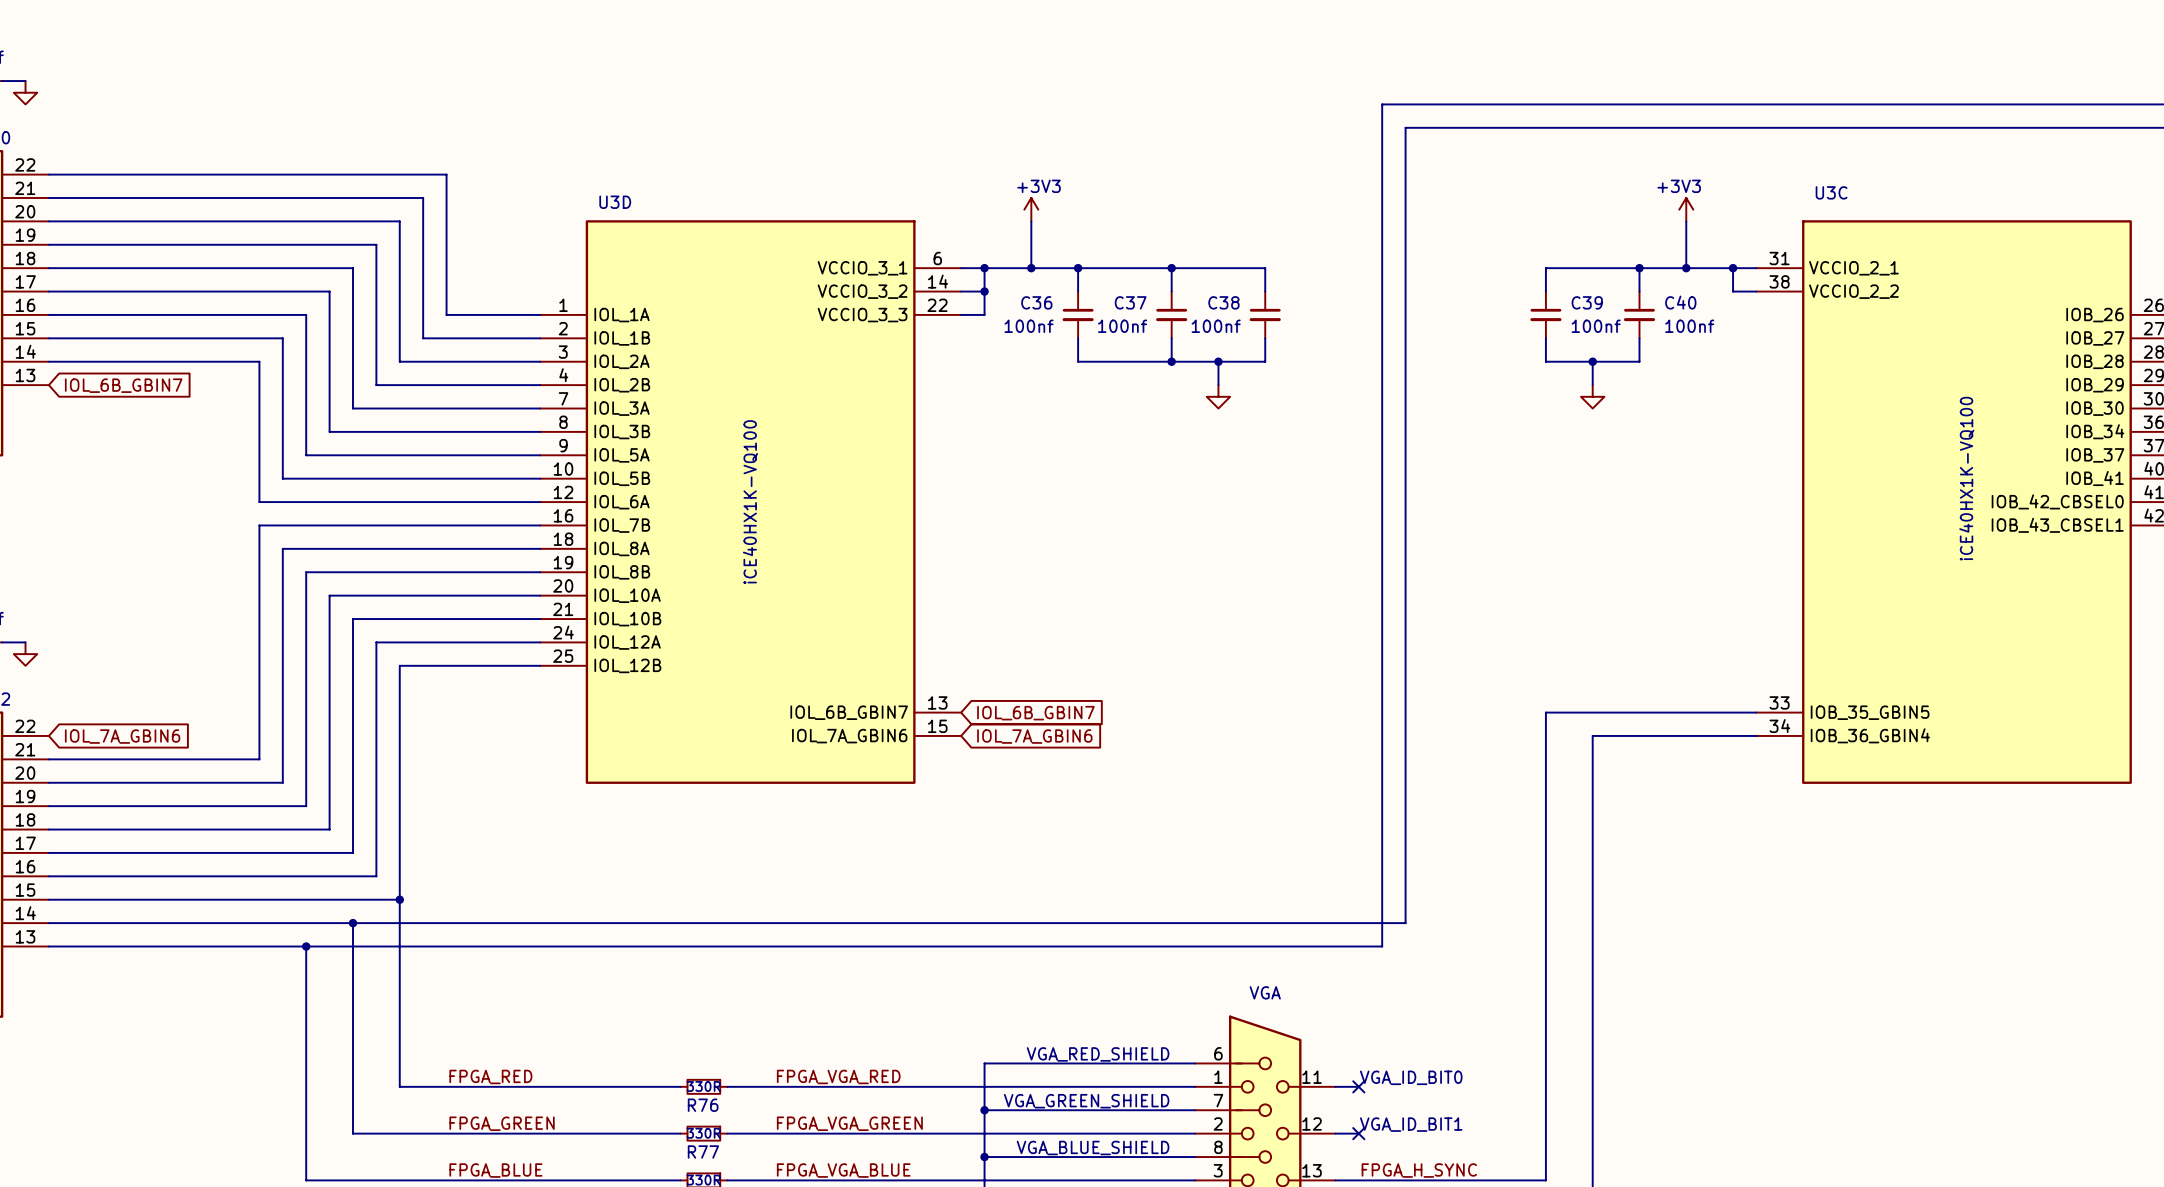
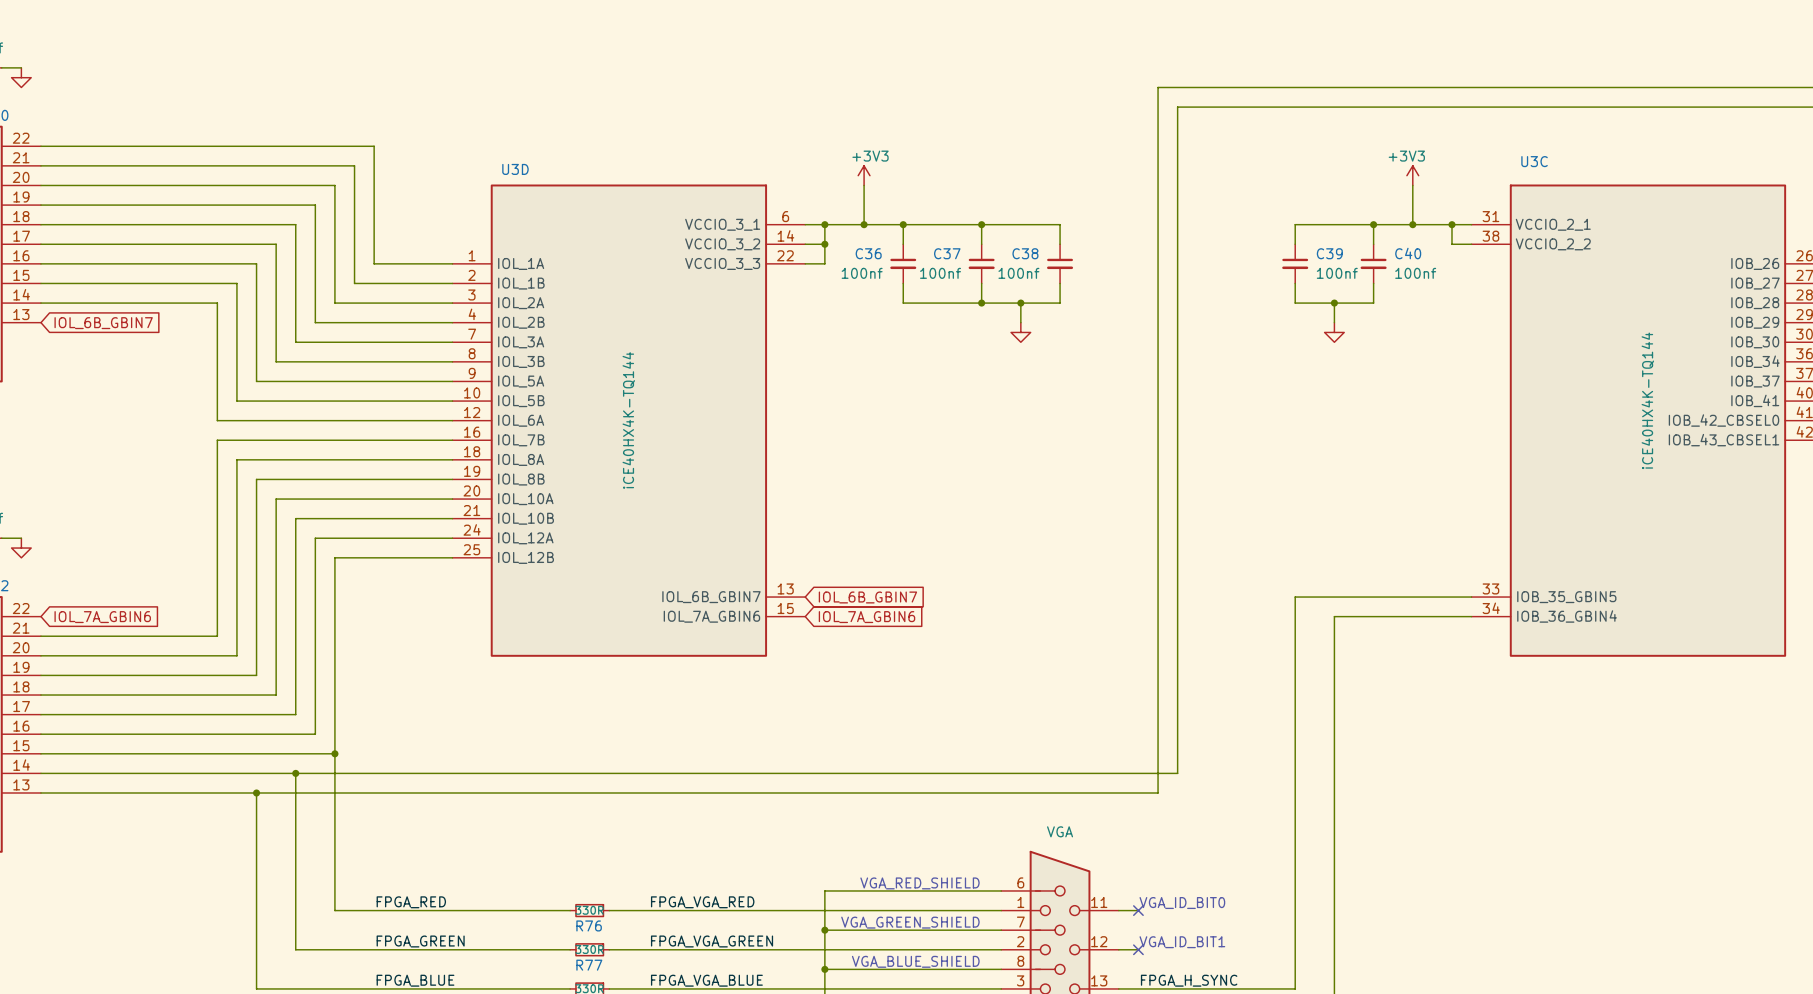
U3C value: iCE40HX1K-VQ100 (1966, 478) -> iCE40HX4K-TQ144 (1647, 400)
U3D value: iCE40HX1K-VQ100 (750, 502) -> iCE40HX4K-TQ144 (628, 420)

